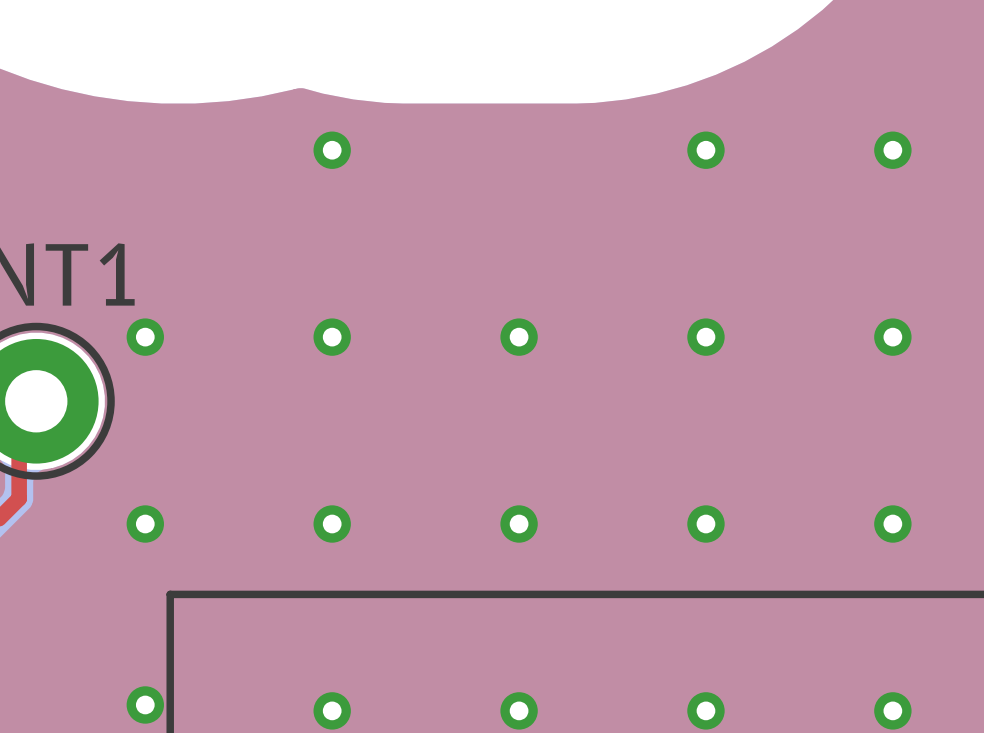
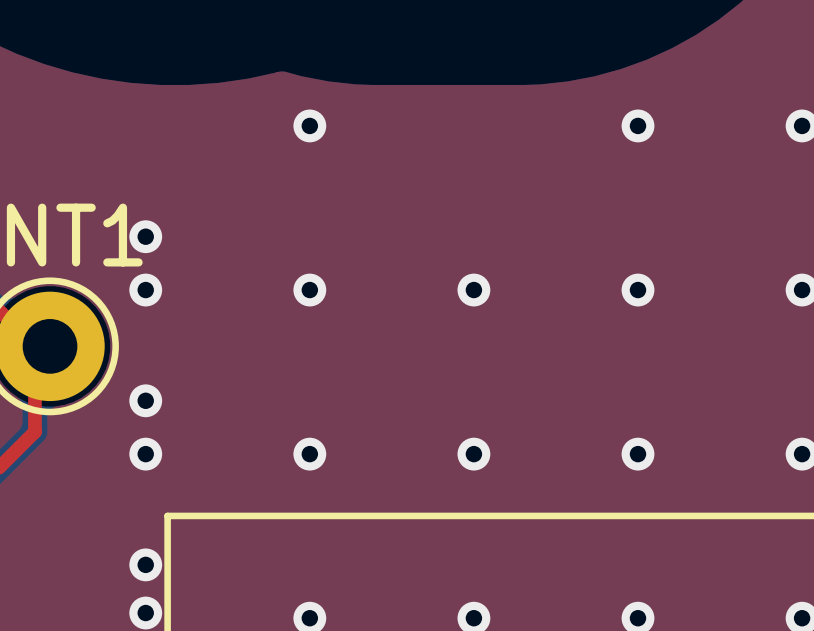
via: none -> (145, 236)
via: none -> (145, 400)
via: none -> (145, 564)

